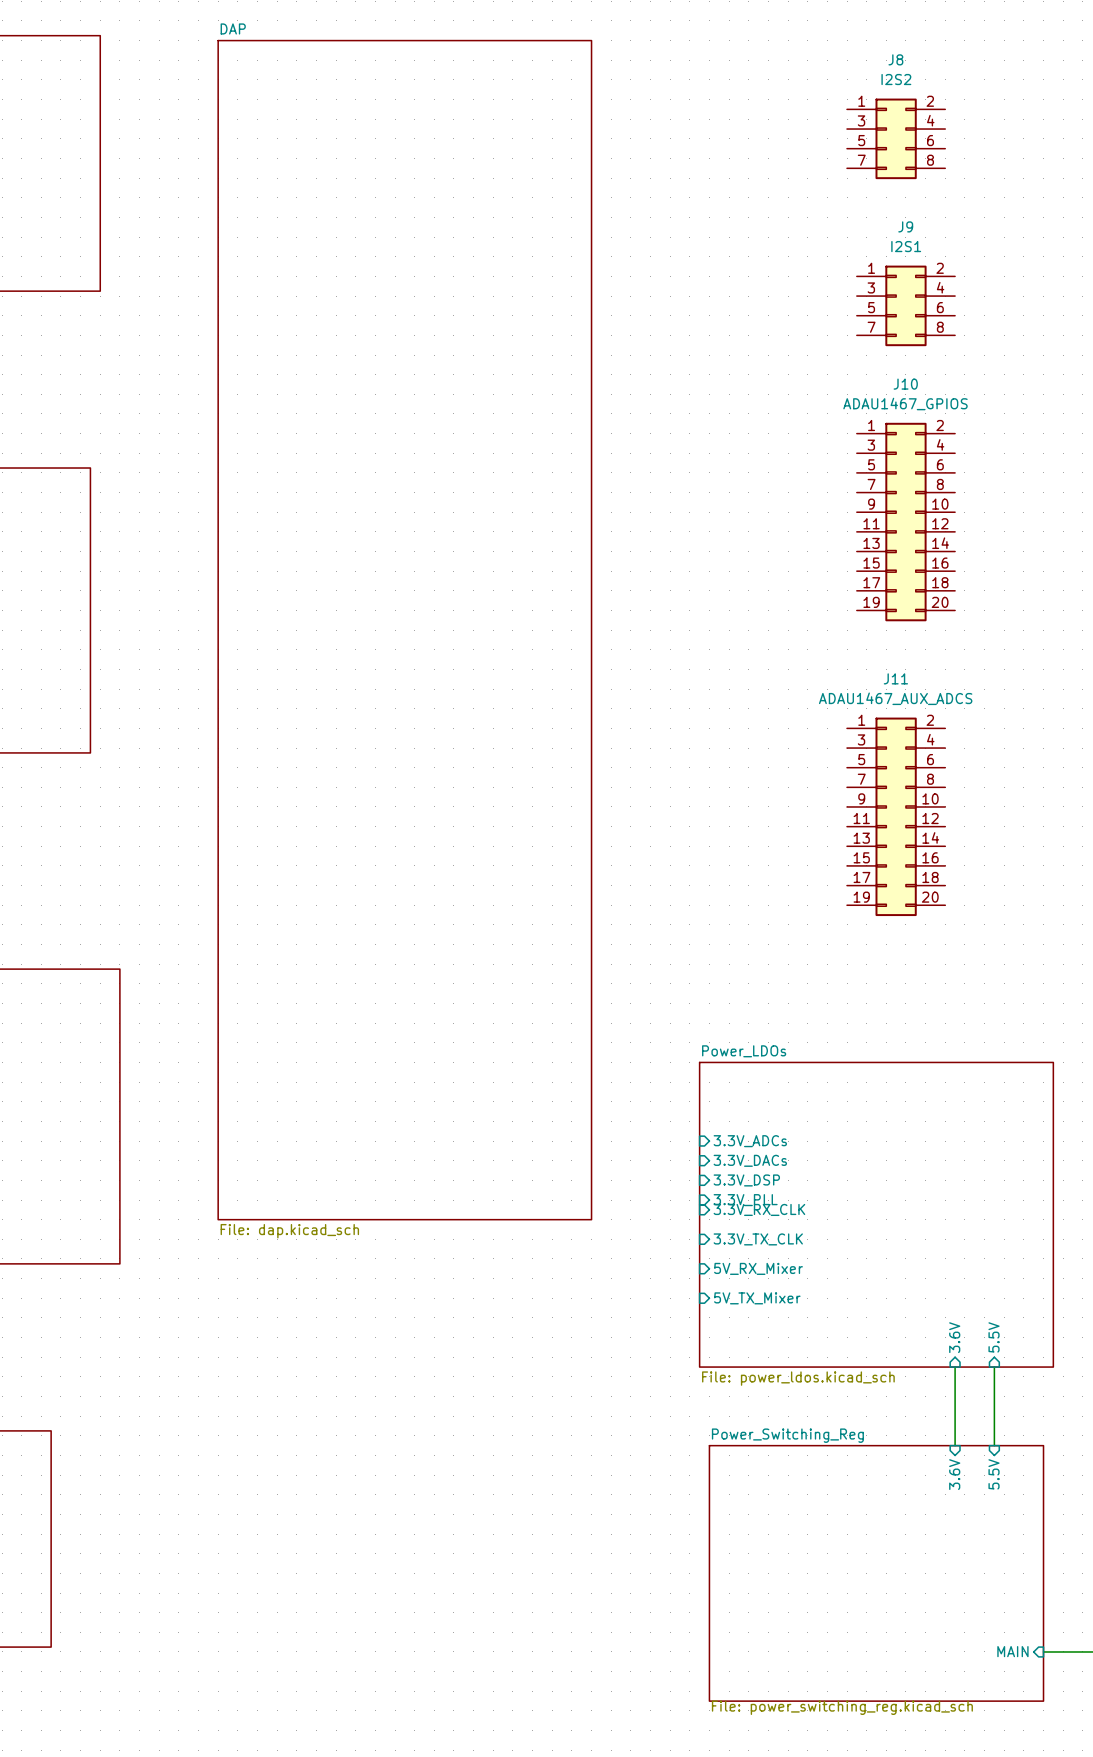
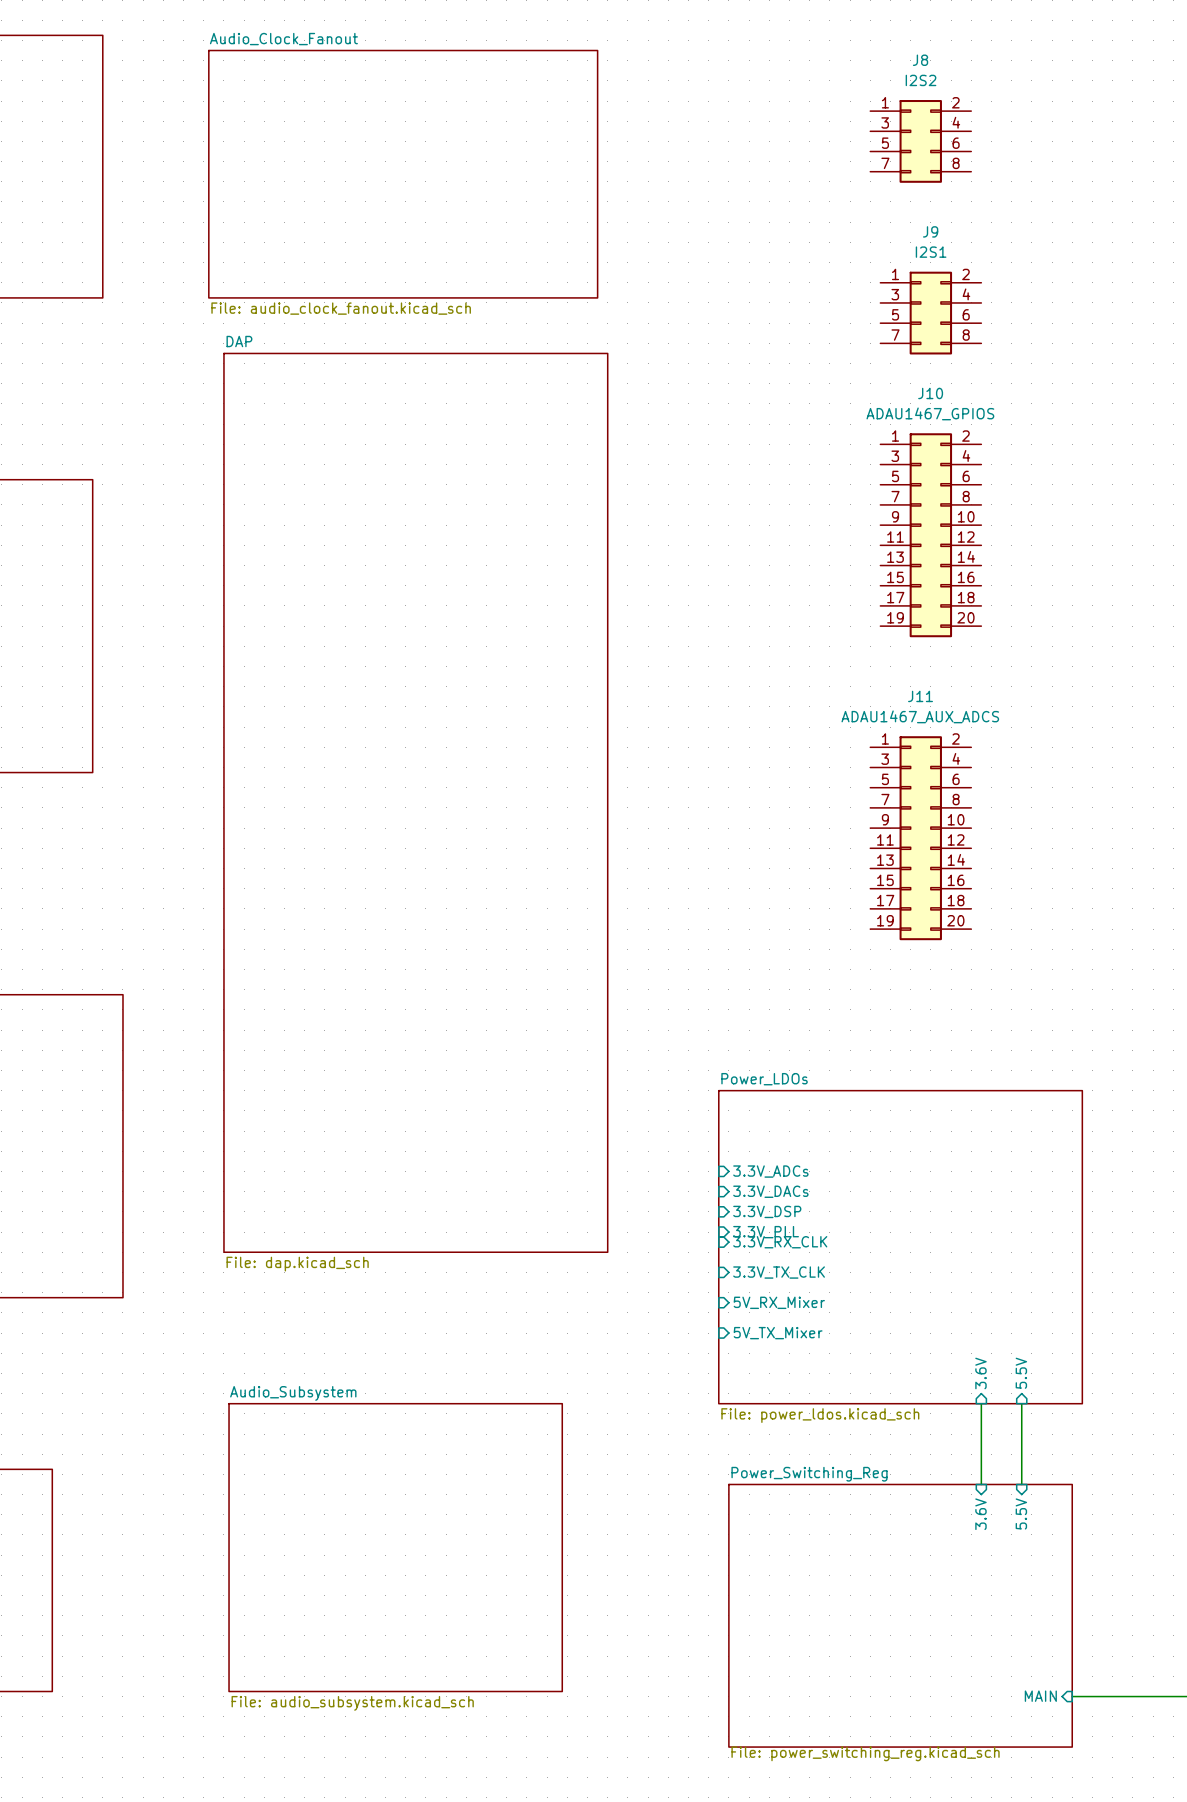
sheet Audio_Clock_Fanout: none -> File: audio_clock_fanout.kicad_sch (403, 174)
sheet DAP: File: dap.kicad_sch (404, 630) -> none
sheet DAP: none -> File: dap.kicad_sch (415, 802)
sheet Audio_Subsystem: none -> File: audio_subsystem.kicad_sch (395, 1547)

